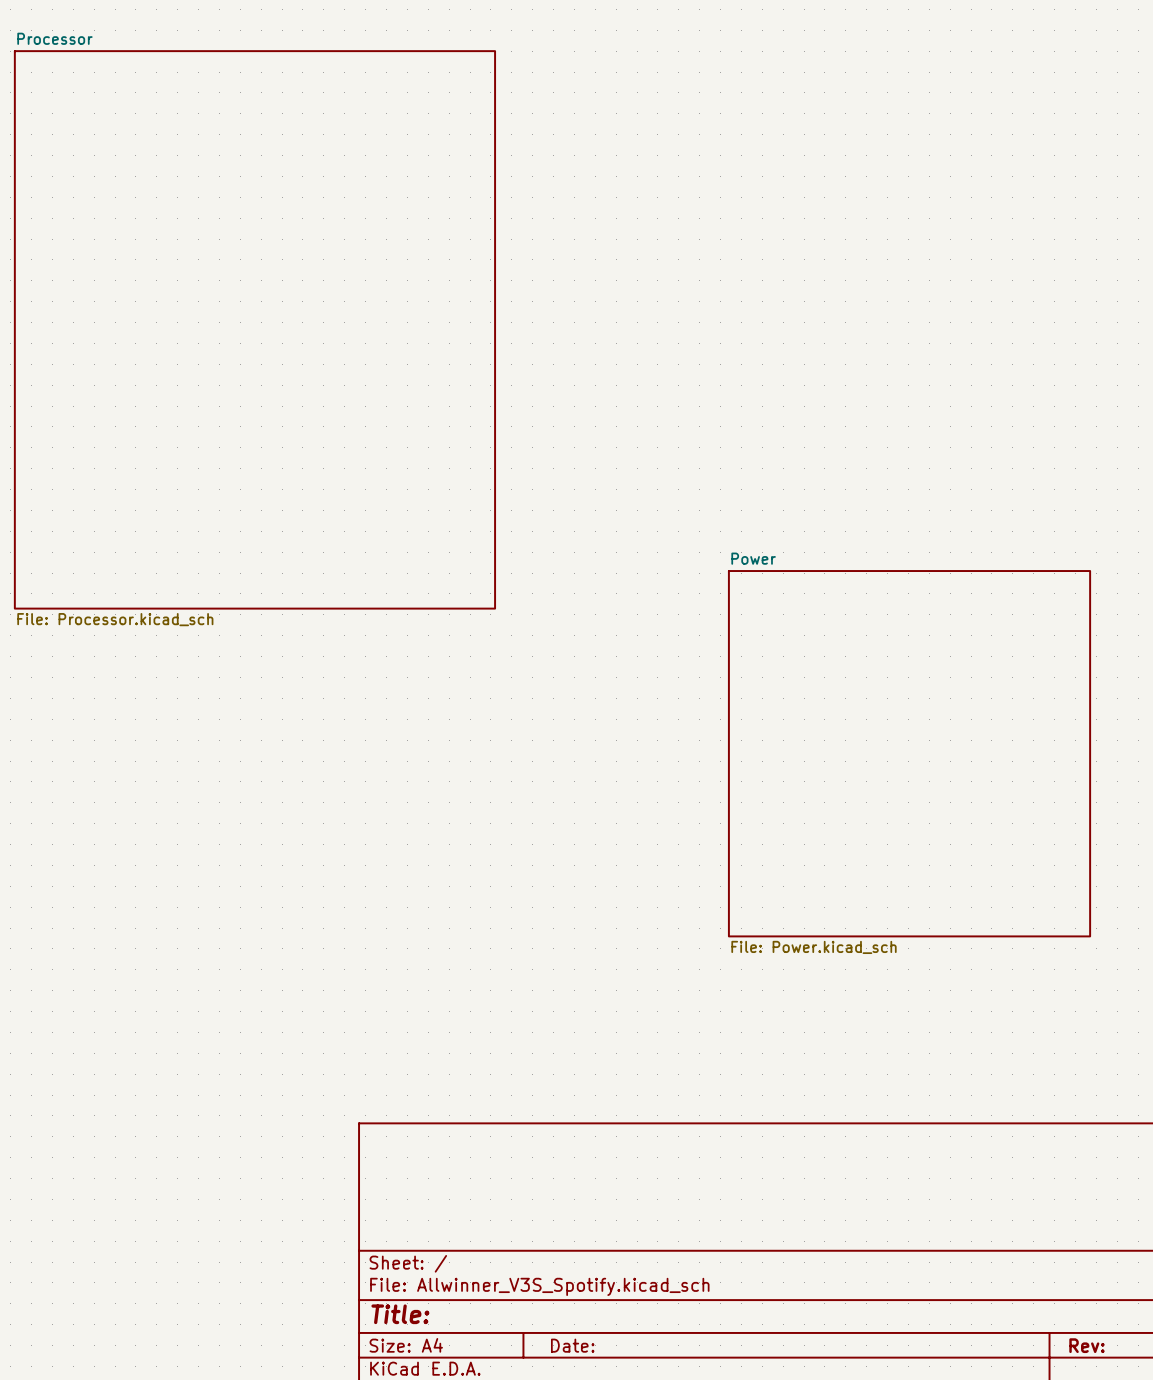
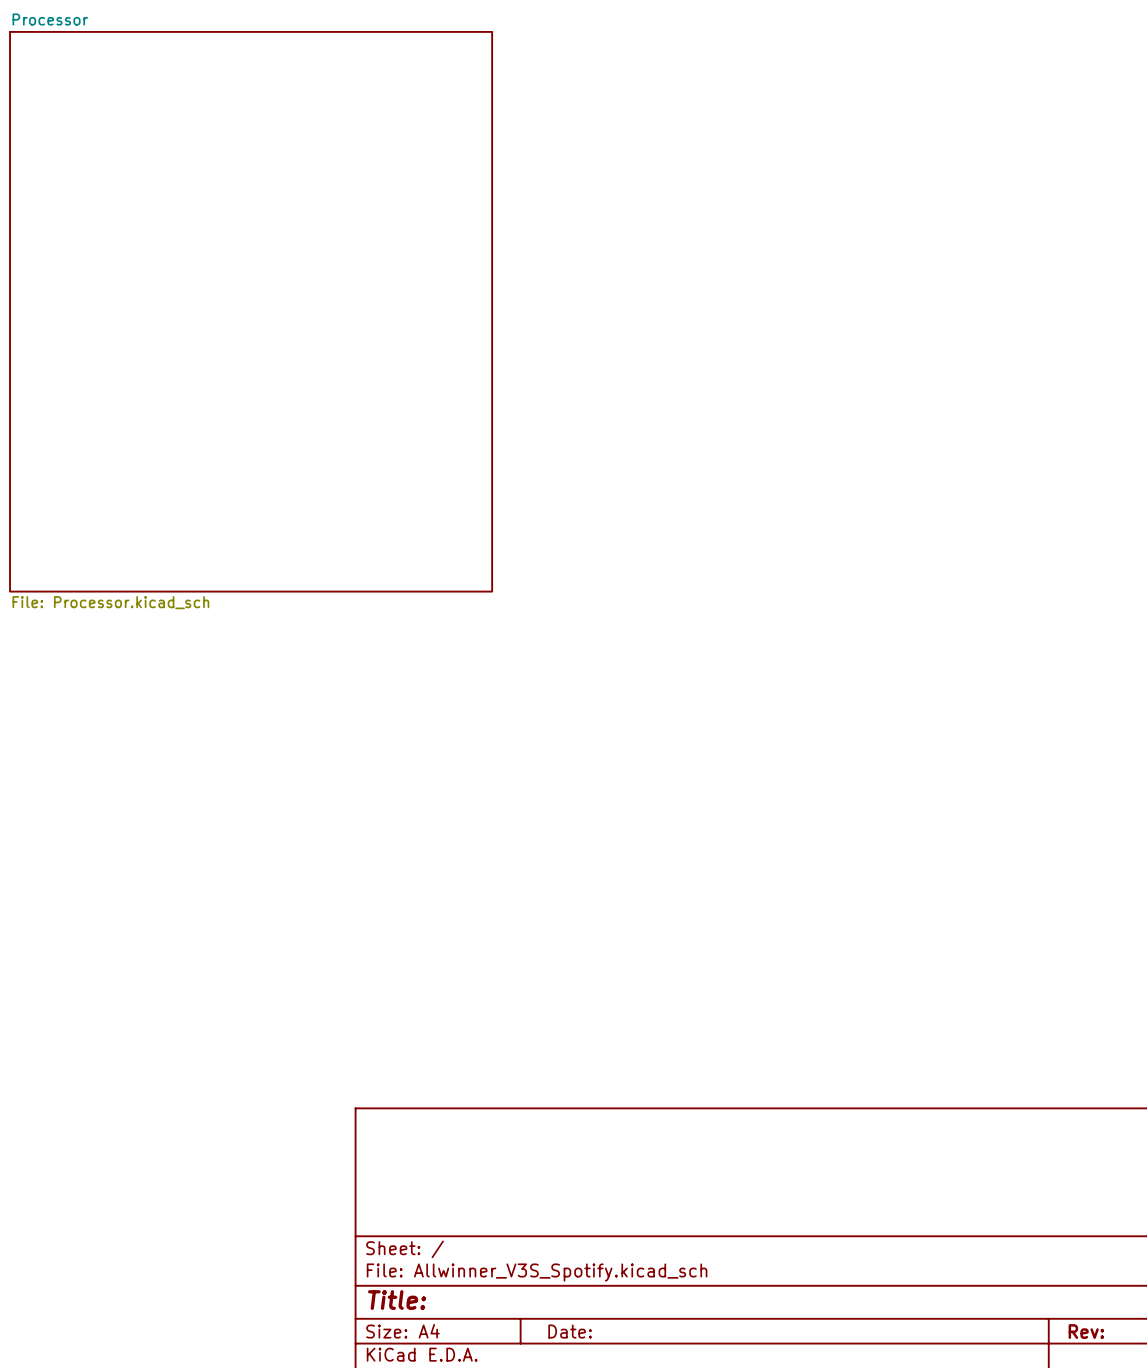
sheet Power: File: Power.kicad_sch (909, 753) -> none

